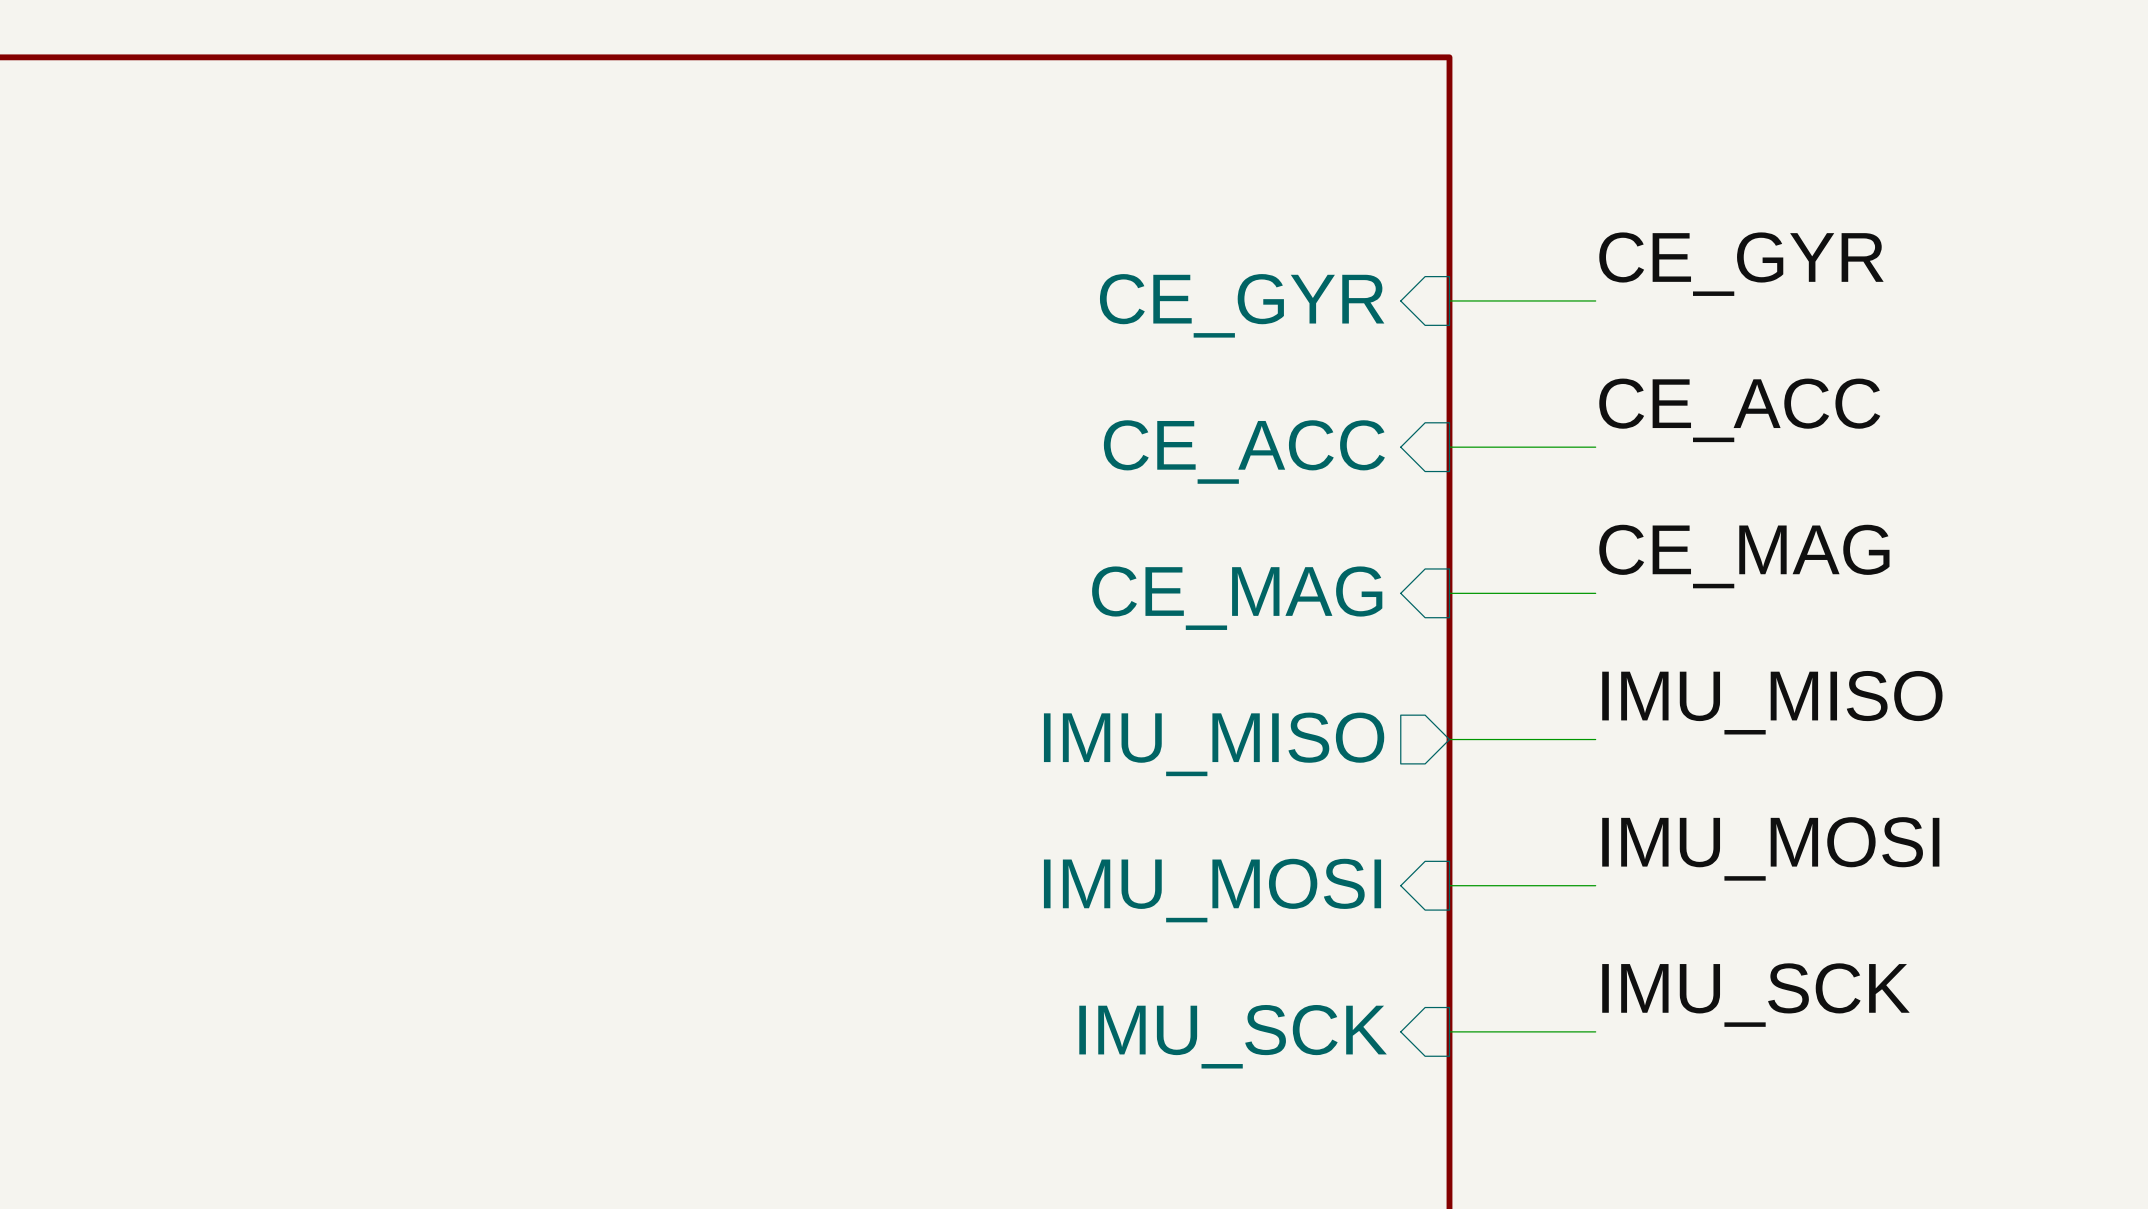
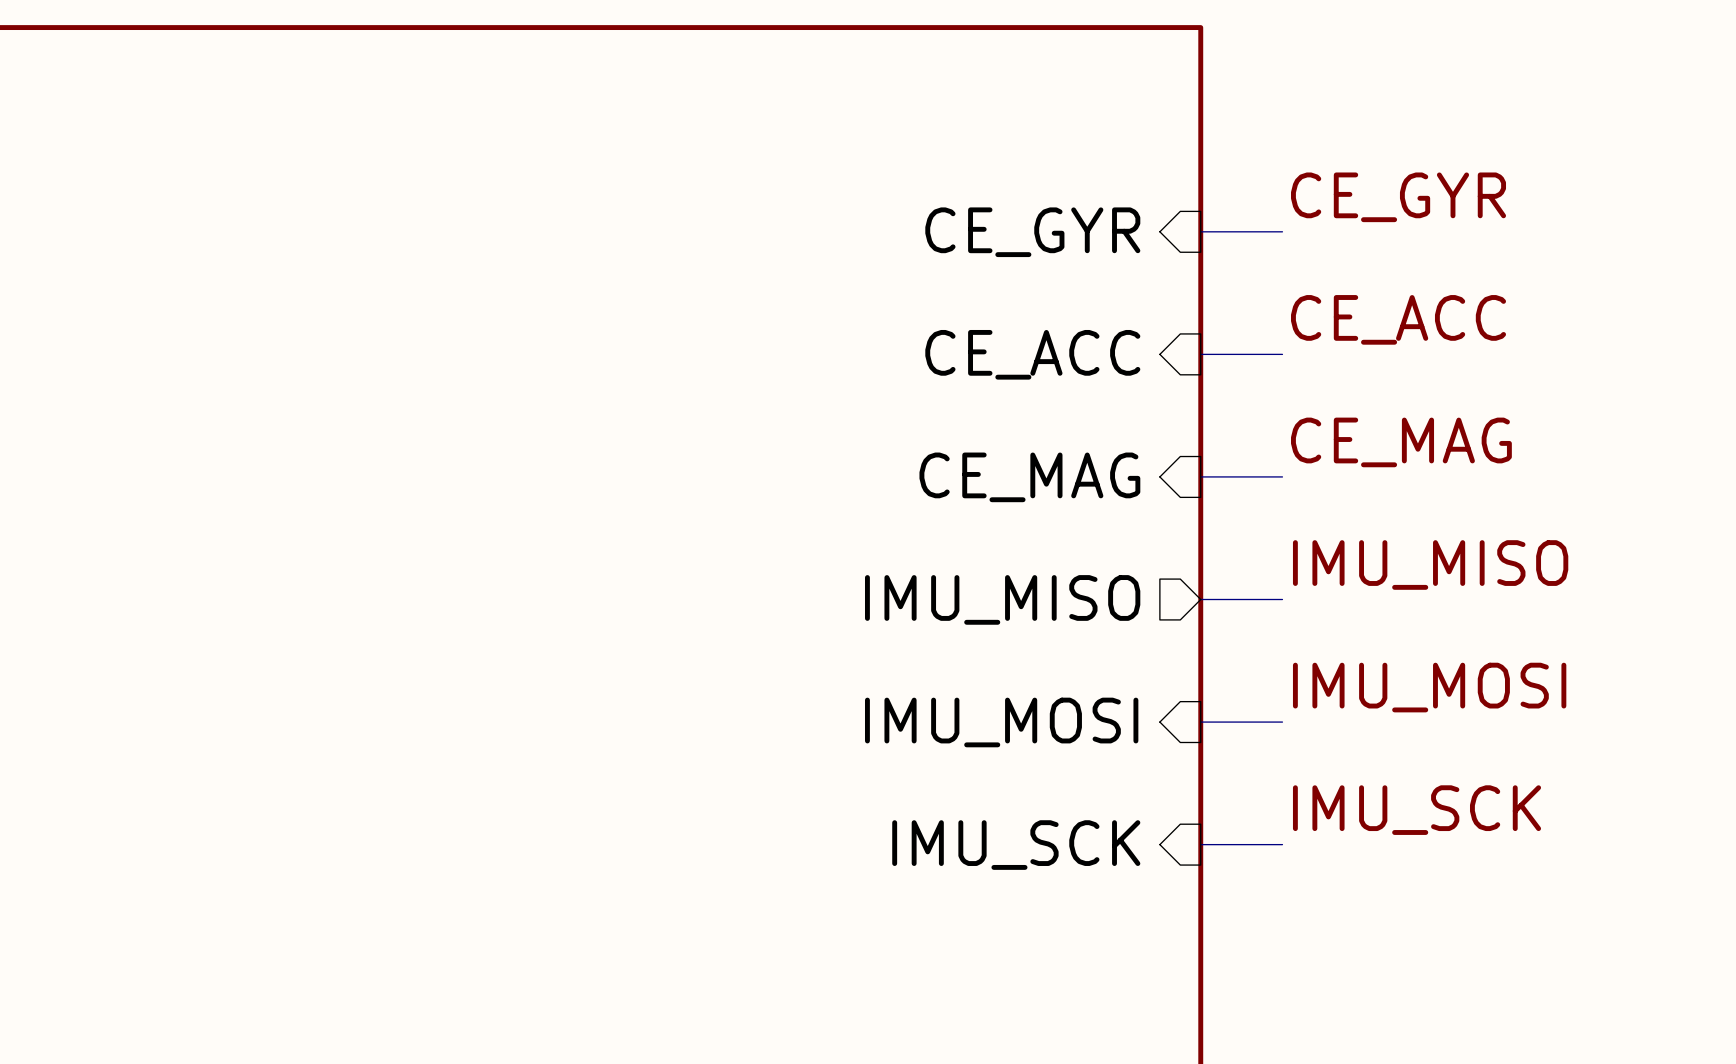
label position: CE_GYR (1741, 264) -> CE_GYR (1398, 197)
wire: (1546, 300) (1595, 300) -> none
label position: CE_ACC (1739, 410) -> CE_ACC (1398, 319)
wire: (1546, 447) (1595, 447) -> none
label position: CE_MAG (1744, 556) -> CE_MAG (1401, 442)
wire: (1546, 593) (1595, 593) -> none
label position: IMU_MISO (1772, 702) -> IMU_MISO (1430, 564)
wire: (1546, 739) (1595, 739) -> none
label position: IMU_MOSI (1770, 848) -> IMU_MOSI (1429, 687)
wire: (1546, 885) (1595, 885) -> none
label position: IMU_SCK (1755, 995) -> IMU_SCK (1416, 810)
wire: (1546, 1031) (1595, 1031) -> none

